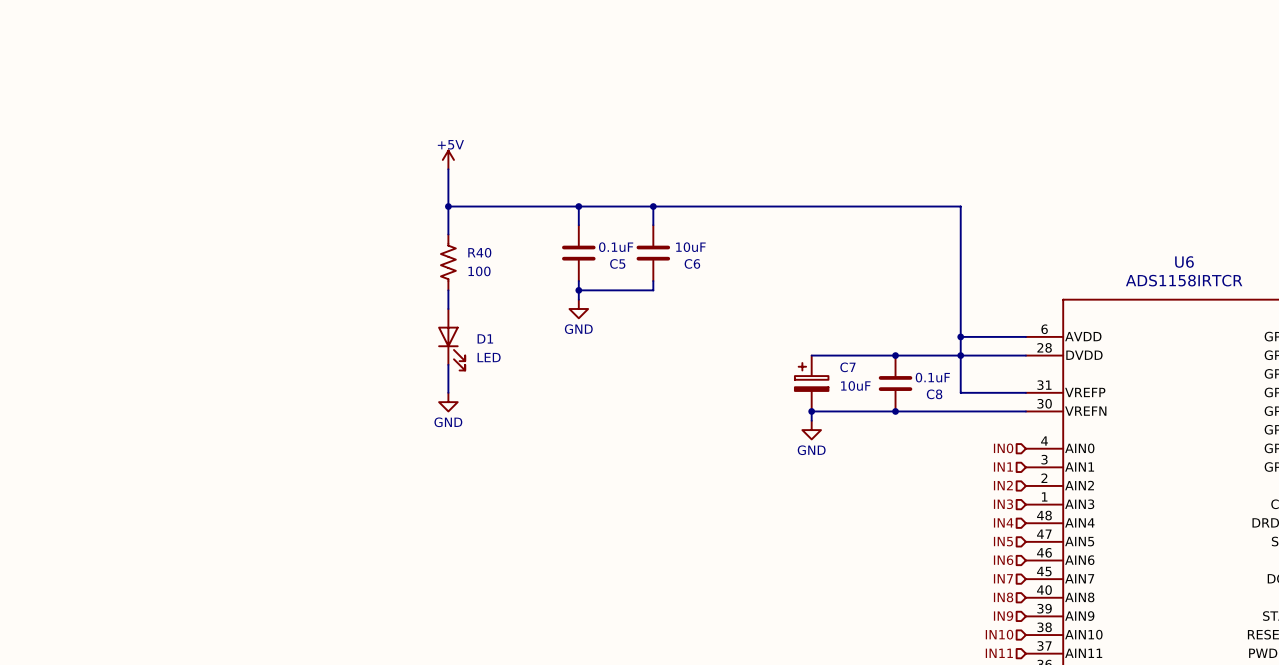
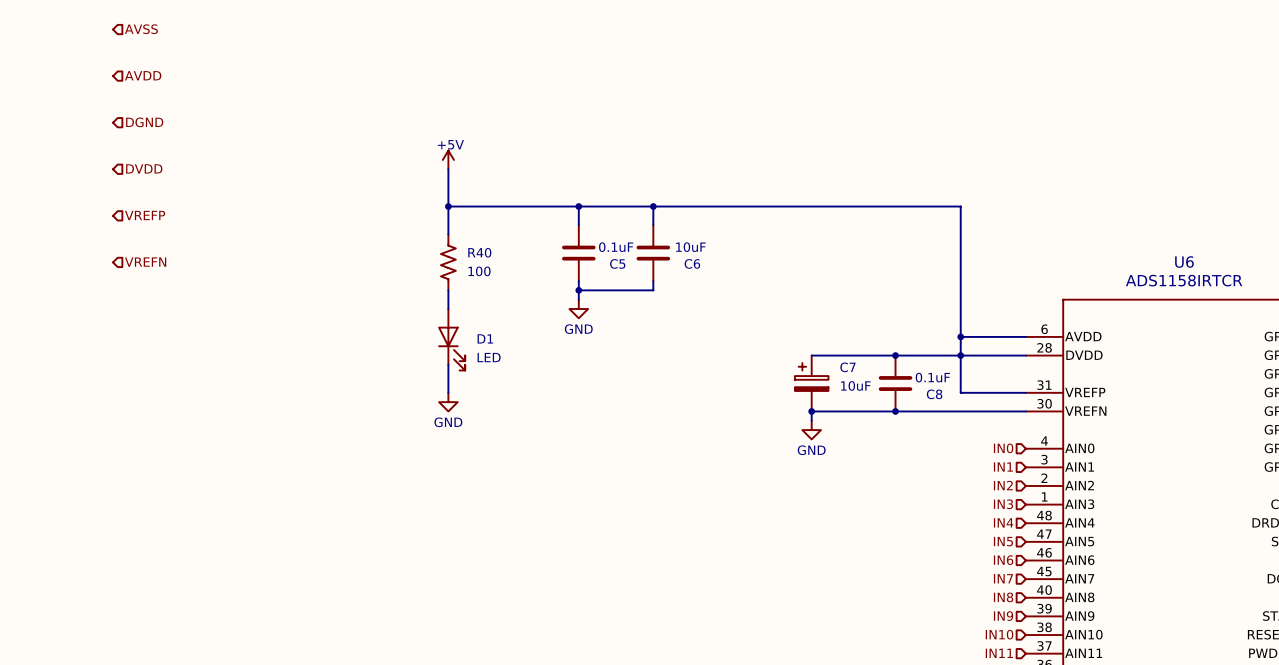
hierarchical label: none -> AVSS (141, 29)
hierarchical label: none -> AVDD (143, 75)
hierarchical label: none -> DGND (144, 122)
hierarchical label: none -> DVDD (144, 168)
hierarchical label: none -> VREFP (145, 215)
hierarchical label: none -> VREFN (145, 262)

